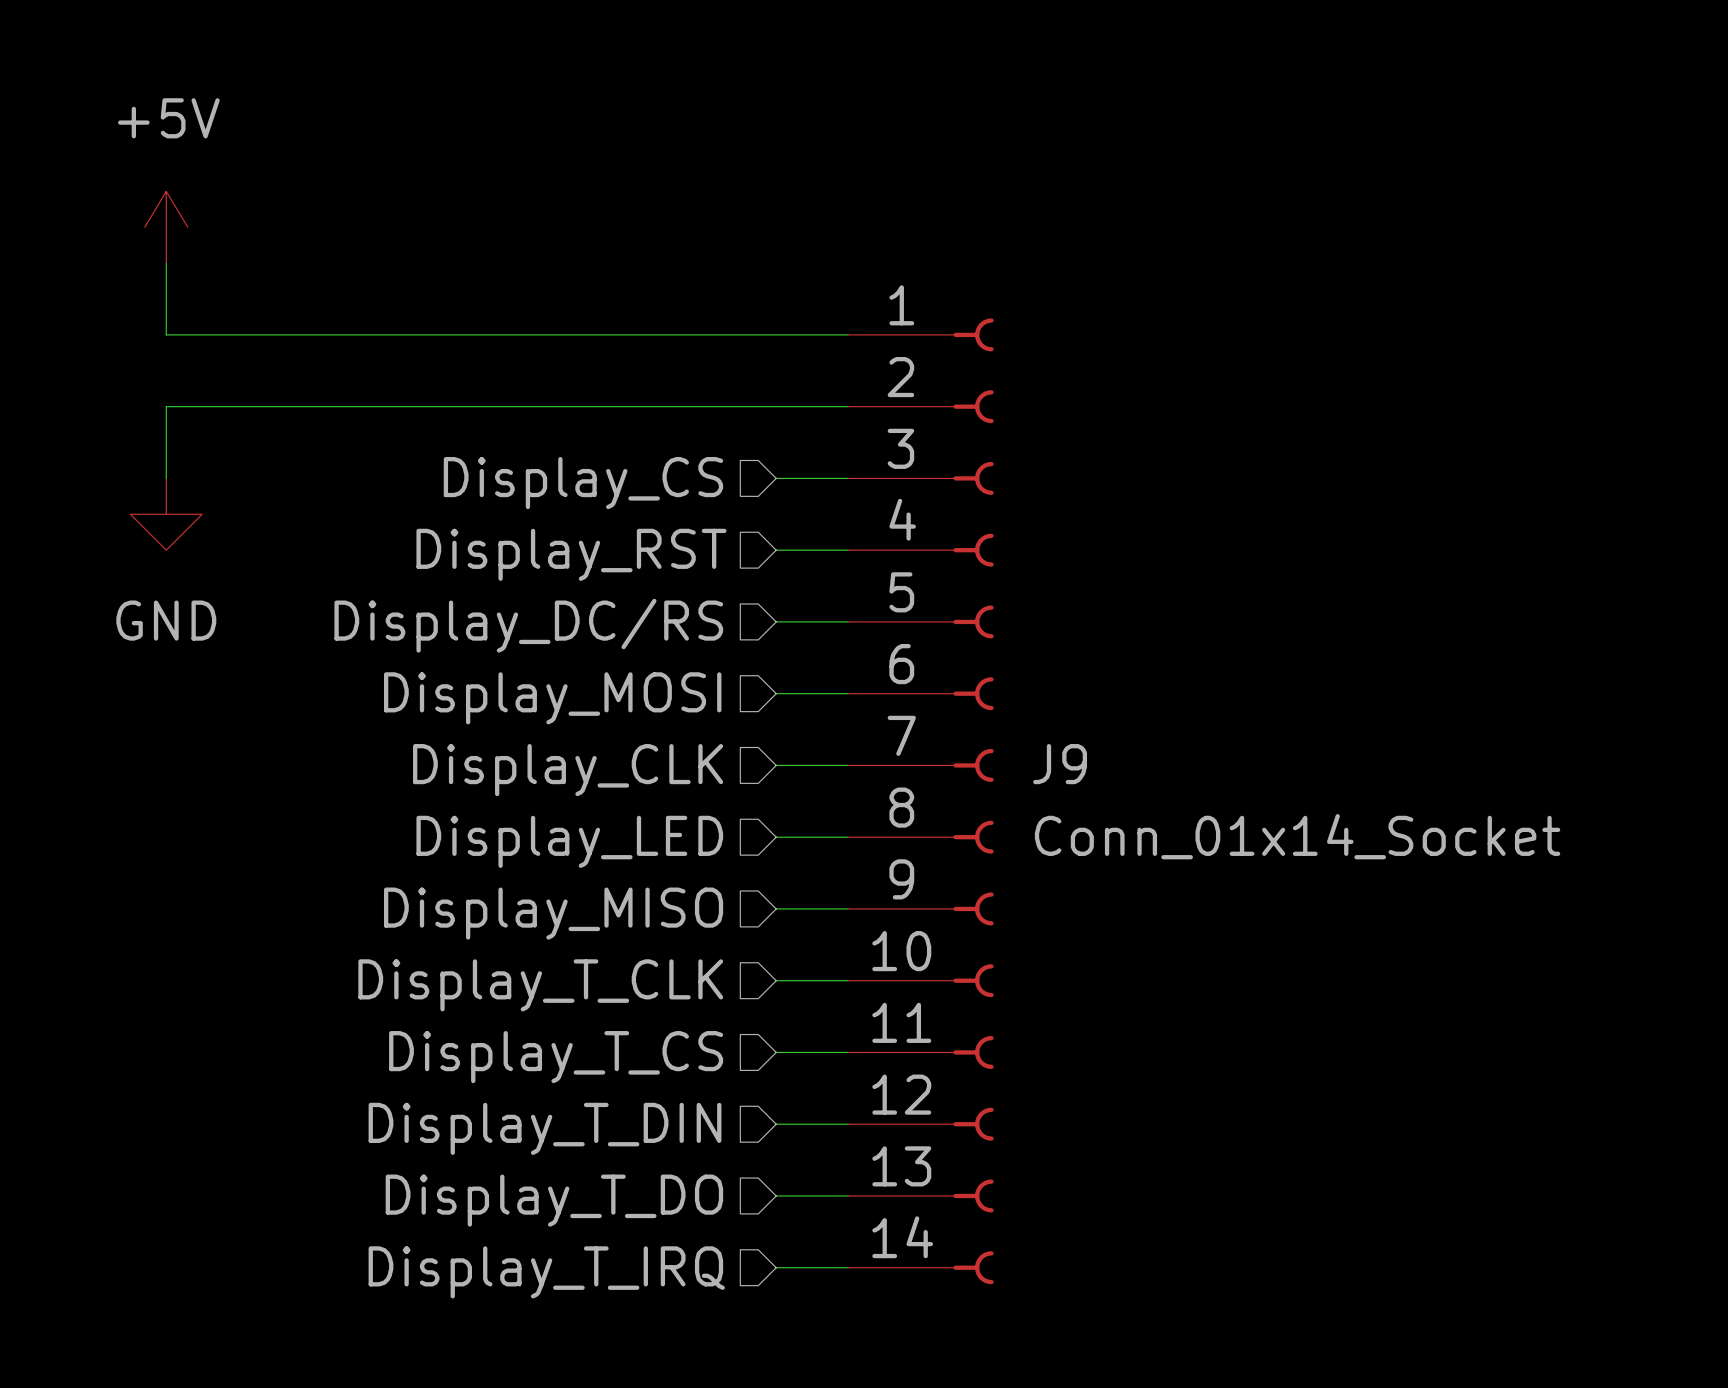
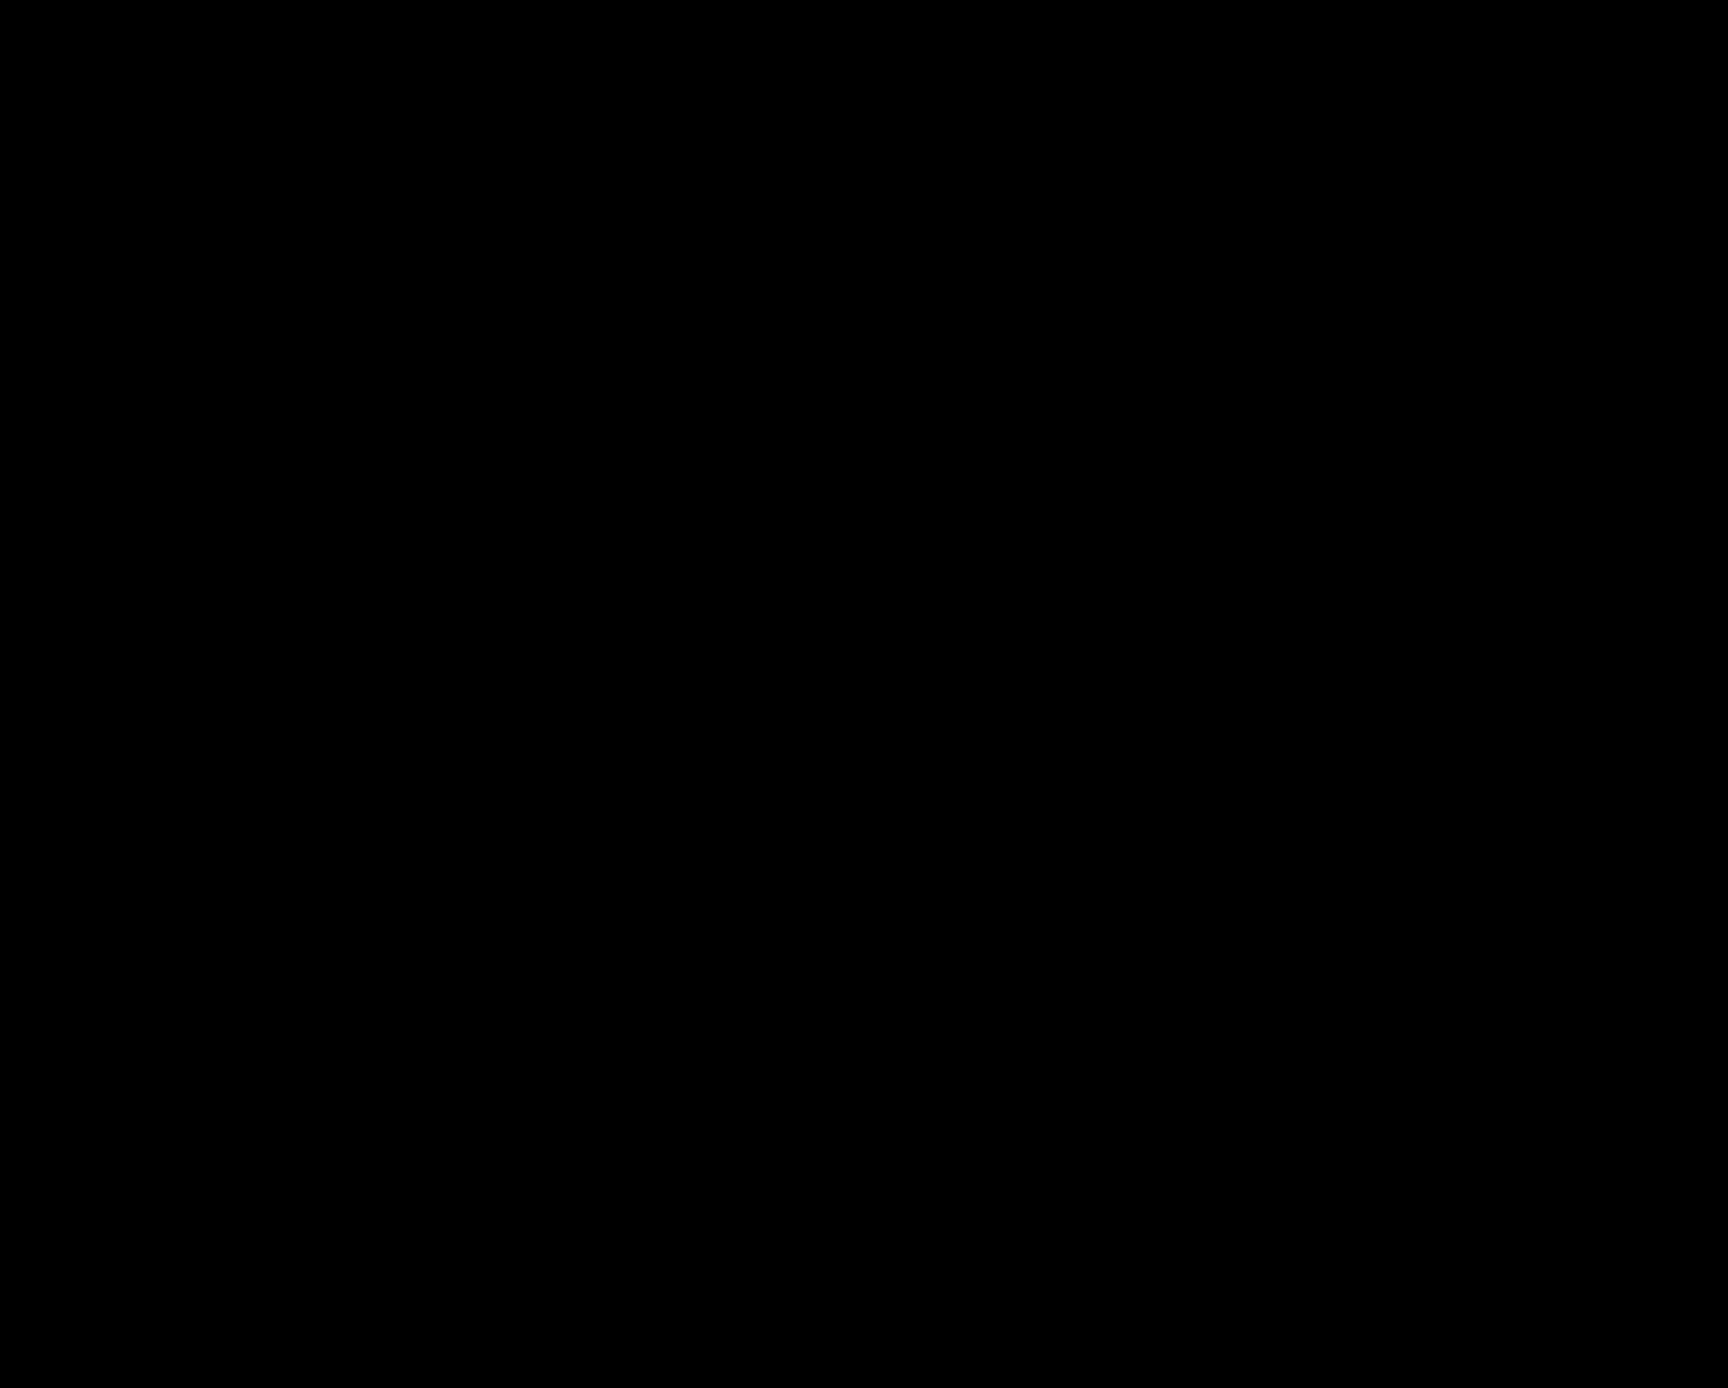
power symbol: +5V (166, 227) -> none
wire: (166, 263) (166, 334) (847, 334) -> none
wire: (847, 406) (166, 406) (166, 478) -> none
wire: (776, 478) (847, 478) -> none
hierarchical label: Display_CS (583, 483) -> none
power symbol: GND (166, 514) -> none
wire: (776, 550) (847, 550) -> none
hierarchical label: Display_RST (571, 554) -> none
wire: (776, 621) (847, 621) -> none
hierarchical label: Display_DC/RS (528, 625) -> none
wire: (776, 693) (847, 693) -> none
hierarchical label: Display_MOSI (552, 698) -> none
wire: (776, 765) (847, 765) -> none
hierarchical label: Display_CLK (568, 770) -> none
J9: Conn_01x14_Socket (920, 801) -> none
wire: (776, 837) (847, 837) -> none
hierarchical label: Display_LED (569, 841) -> none
wire: (776, 908) (847, 908) -> none
hierarchical label: Display_MISO (553, 913) -> none
wire: (776, 980) (847, 980) -> none
hierarchical label: Display_T_CLK (540, 985) -> none
wire: (776, 1052) (847, 1052) -> none
hierarchical label: Display_T_CS (556, 1057) -> none
wire: (776, 1124) (847, 1124) -> none
hierarchical label: Display_T_DIN (545, 1128) -> none
wire: (776, 1195) (847, 1195) -> none
hierarchical label: Display_T_DO (554, 1200) -> none
wire: (776, 1267) (847, 1267) -> none
hierarchical label: Display_T_IRQ (546, 1272) -> none

